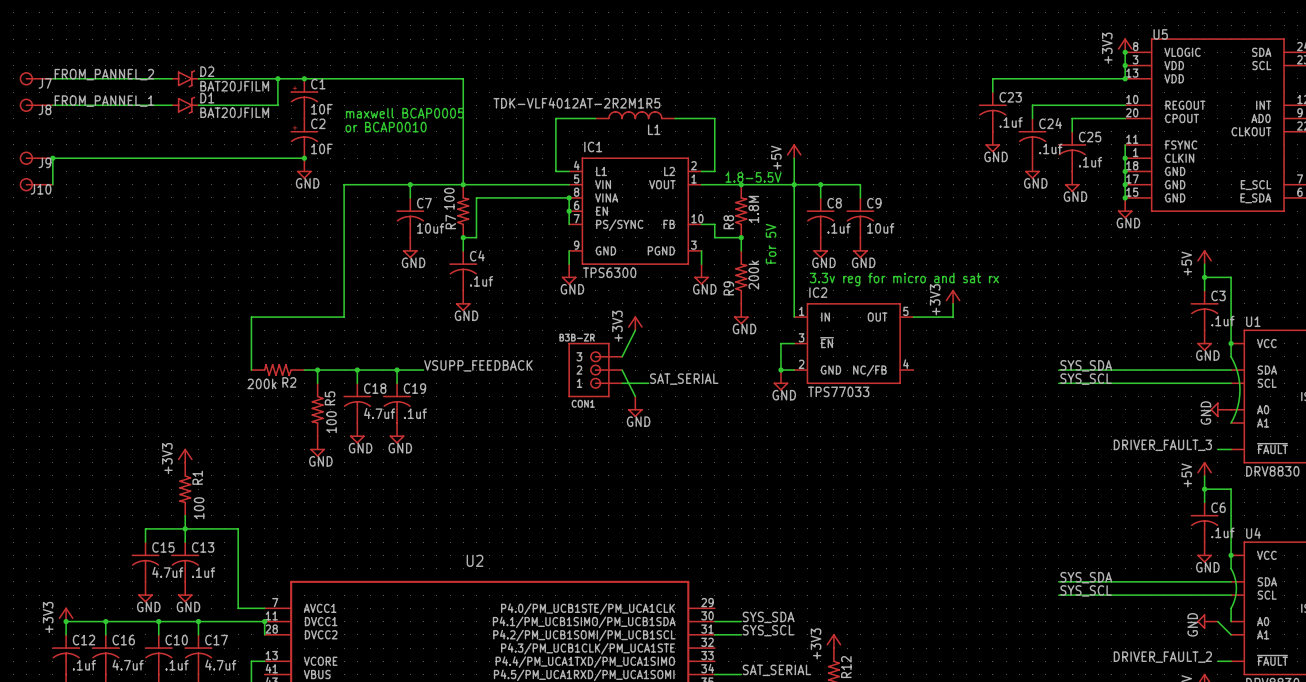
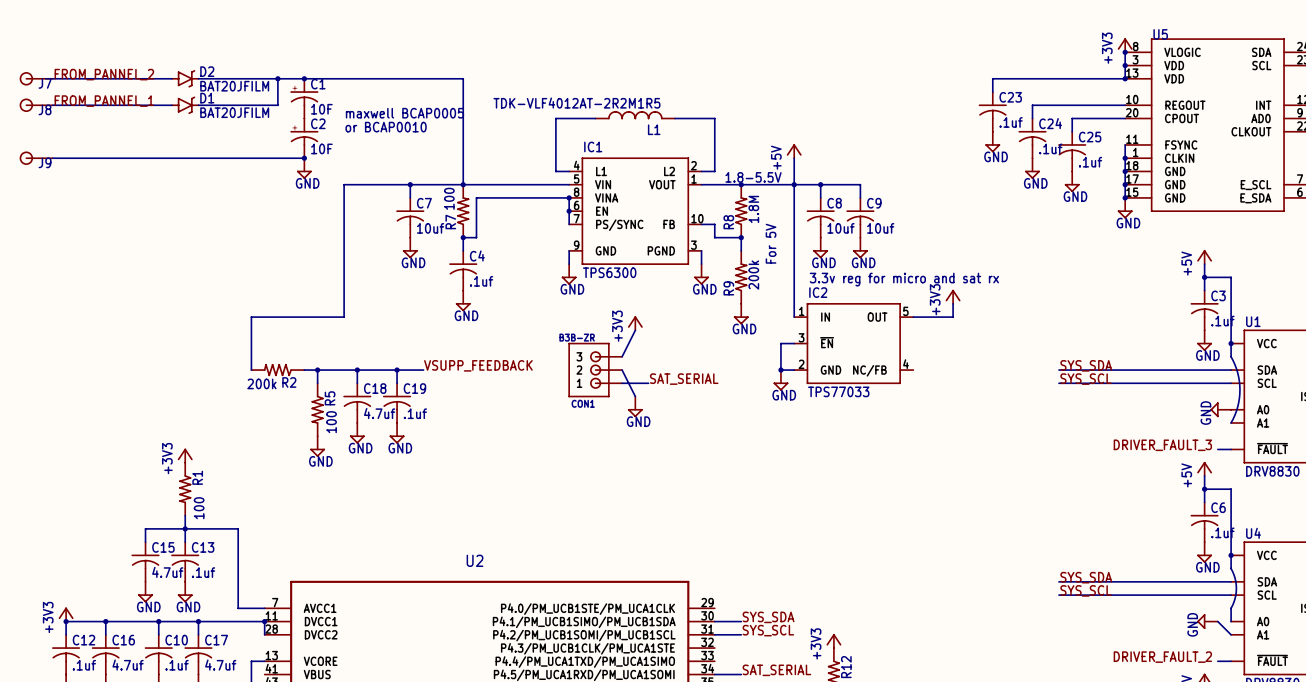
wire: (52, 158) (52, 184) -> none
junction: (52, 158) -> none
J10: (36, 184) -> none
C8 value: .1uf (838, 228) -> 10uf (840, 228)

